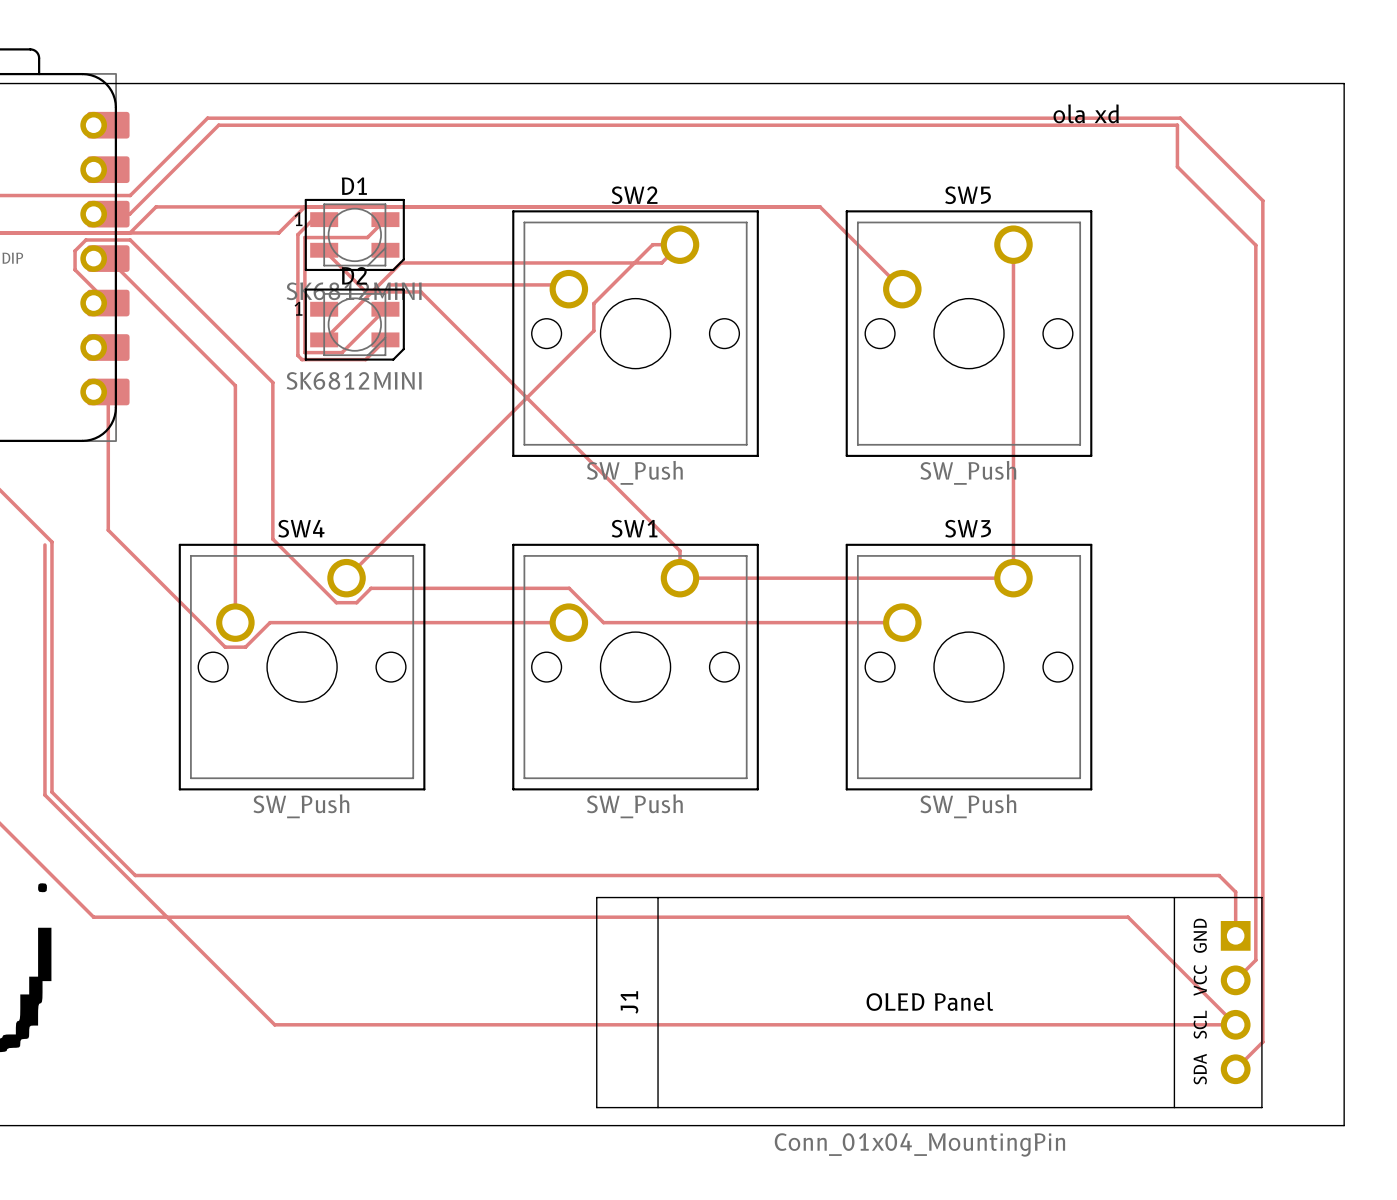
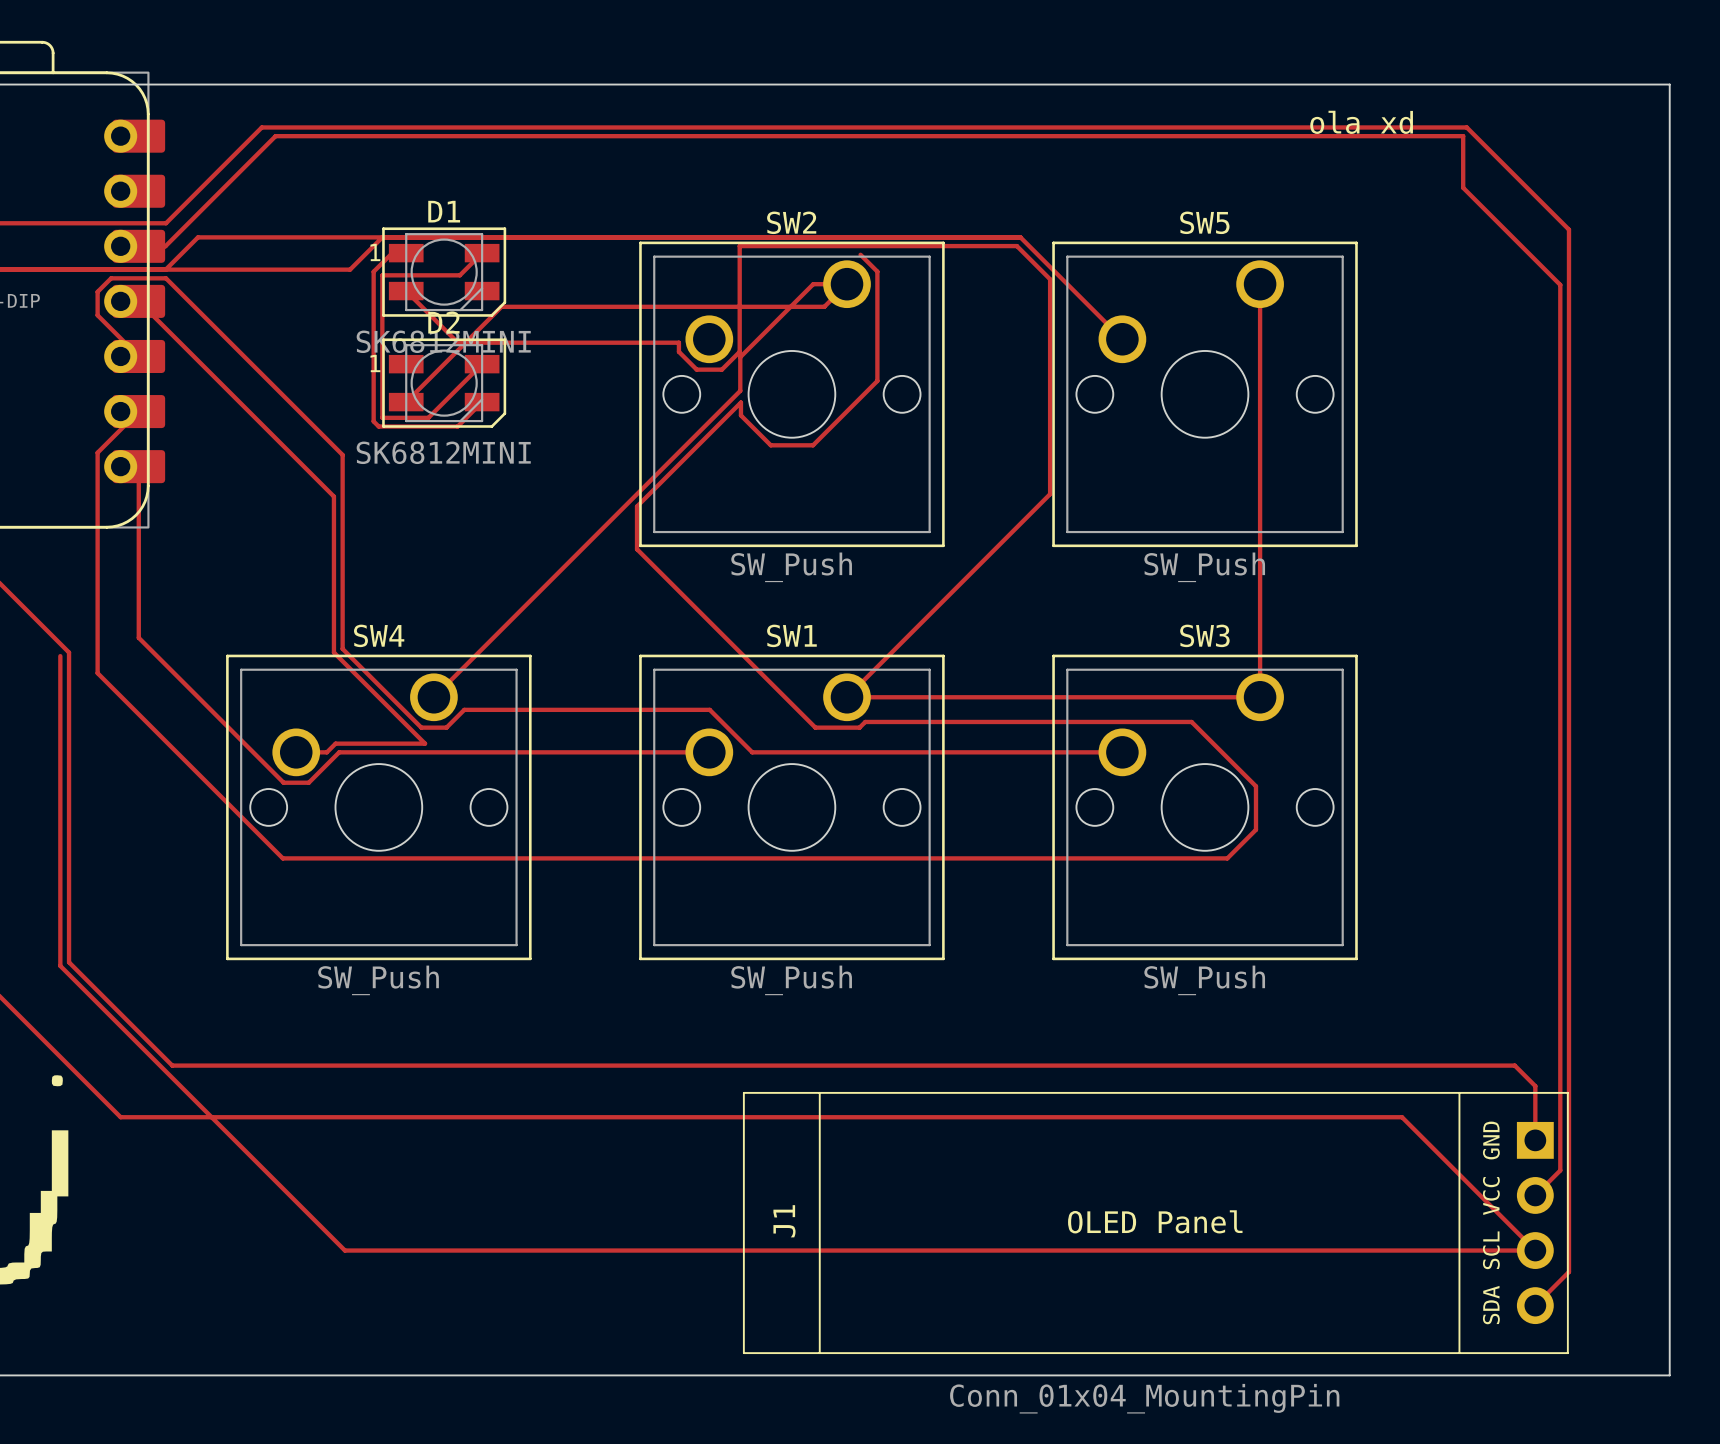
top track: none -> (860, 254) (877, 271) (877, 380) (813, 445) (770, 445) (740, 415) (740, 402) (637, 506) (637, 549) (815, 727) (859, 727) (865, 721) (1191, 721) (1255, 786) (1255, 829) (1227, 858) (282, 858) (97, 673) (97, 452) (138, 411)
top track: (389, 284) (564, 284) -> none
top track: (421, 291) (680, 550) (680, 578) -> (526, 342) (678, 342) (678, 351) (696, 369) (721, 369) (739, 351) (739, 246) (1016, 246) (1050, 279) (1050, 494) (847, 697)
top track: (235, 385) (235, 622) -> (296, 458) (333, 496) (333, 652) (425, 743) (335, 743) (326, 752) (296, 752)

